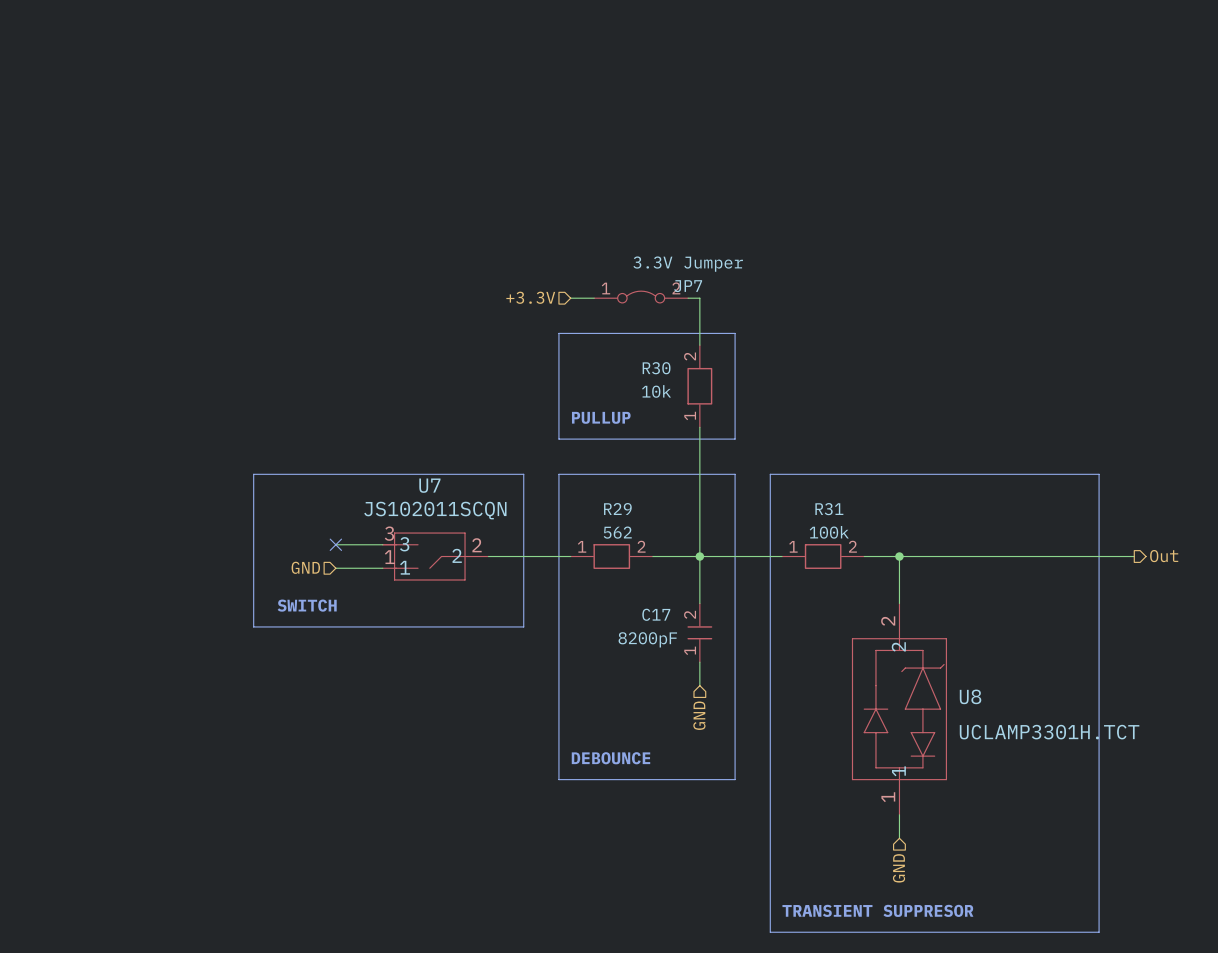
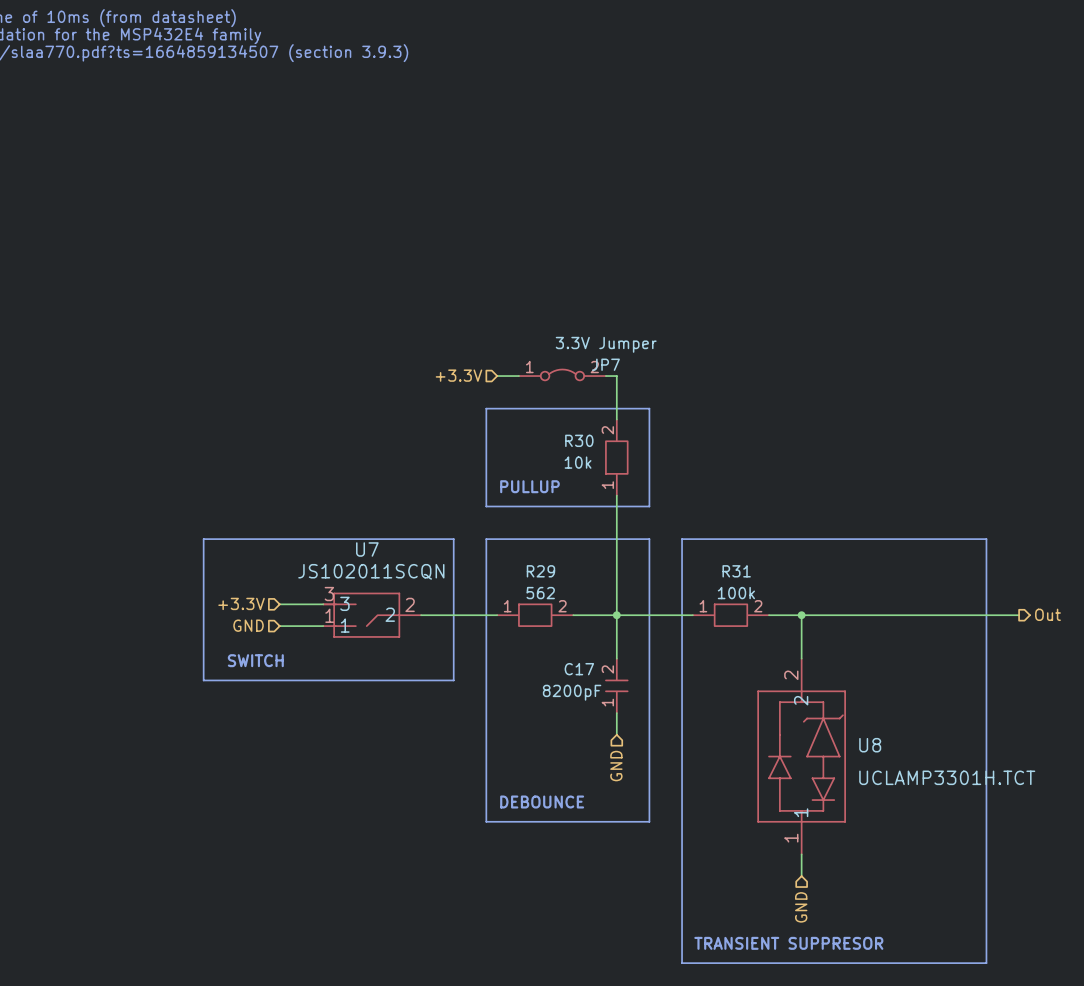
hierarchical label: none -> +3.3V (241, 603)
no-connect mark: (335, 544) -> none

